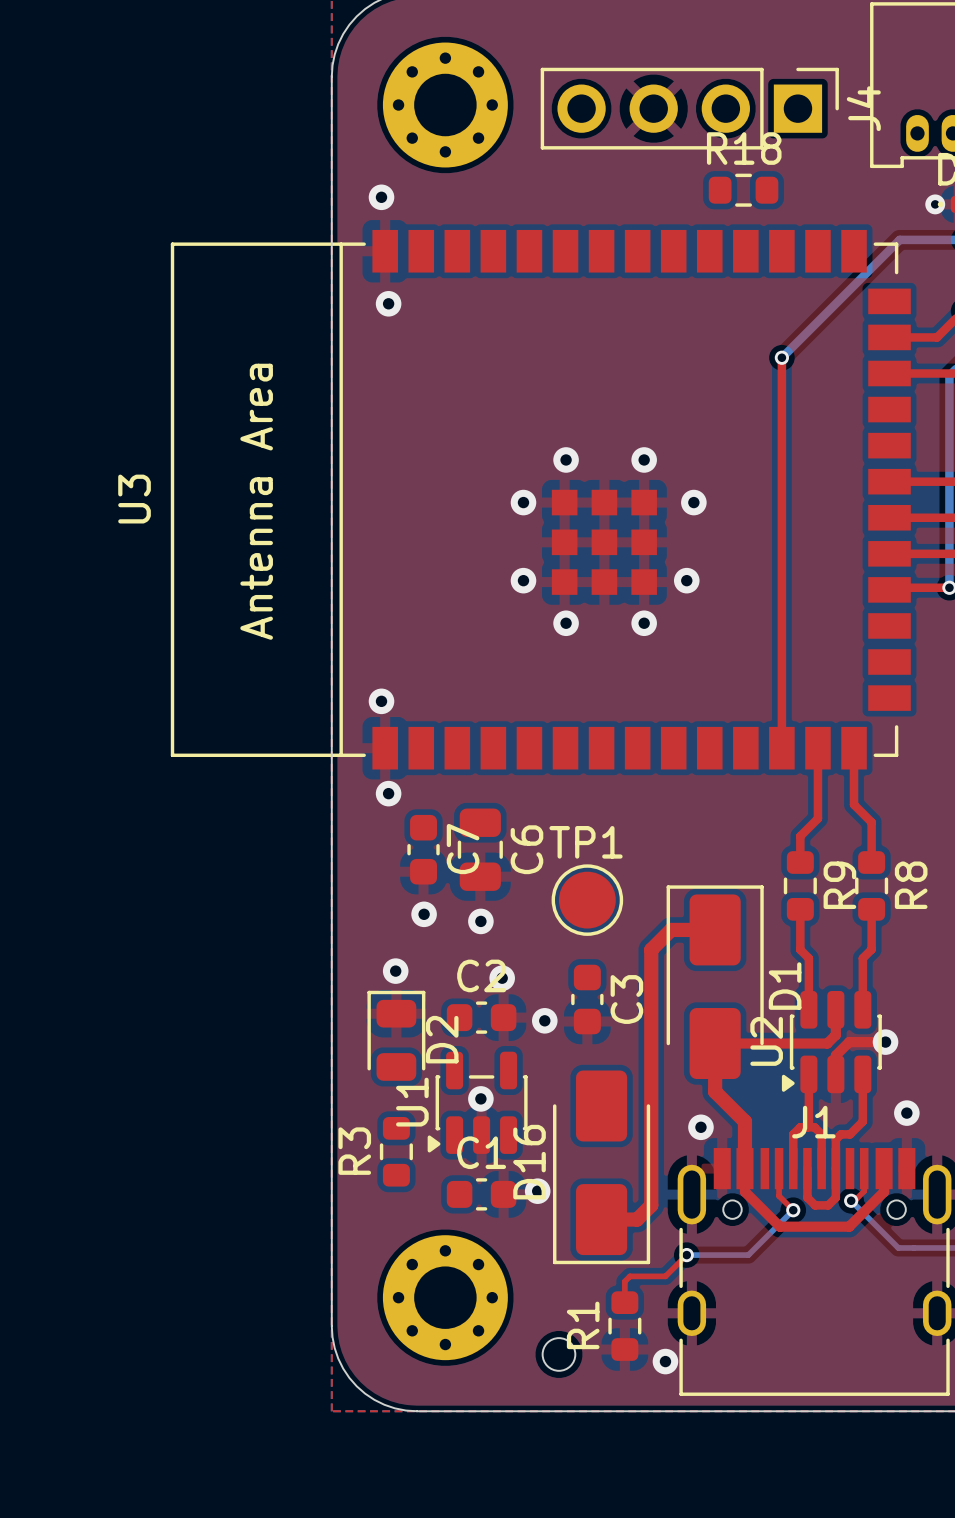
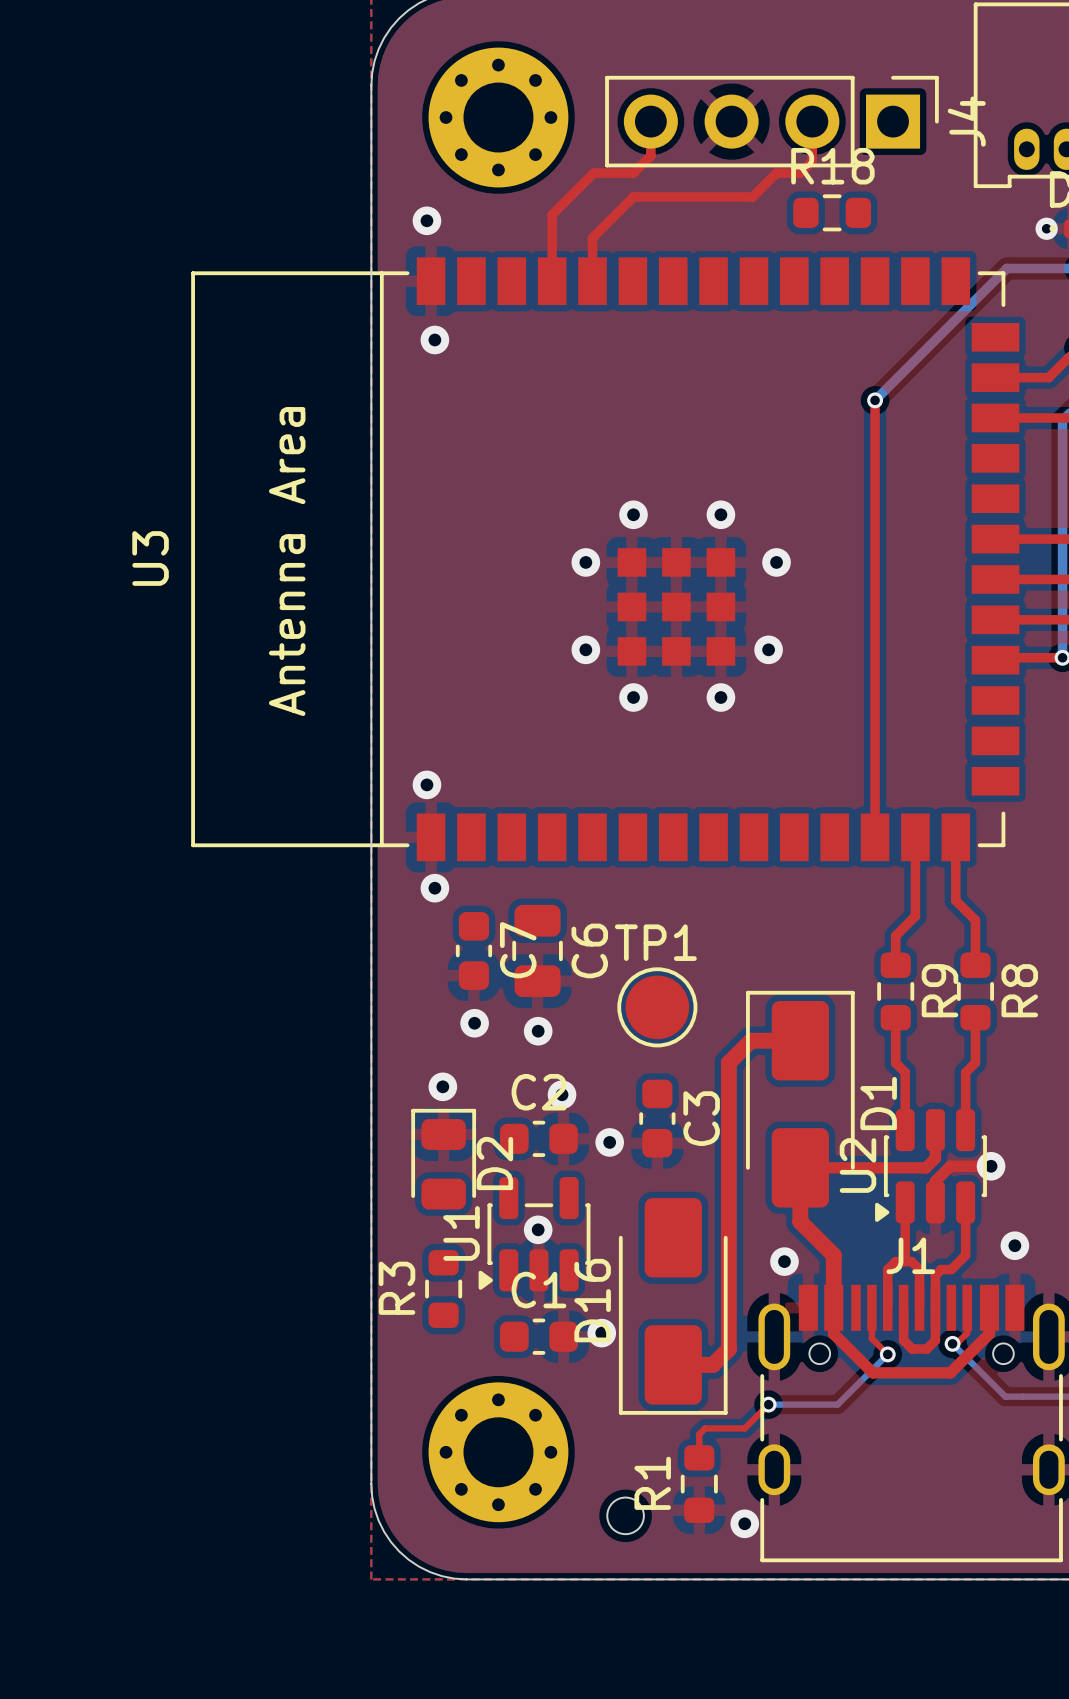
top track: none -> (650, 121) (650, 155) (633, 173) (593, 173) (552, 214) (552, 281)
top track: none -> (812, 121) (812, 161) (800, 173) (776, 173) (752, 196) (633, 196) (592, 237) (592, 281)

